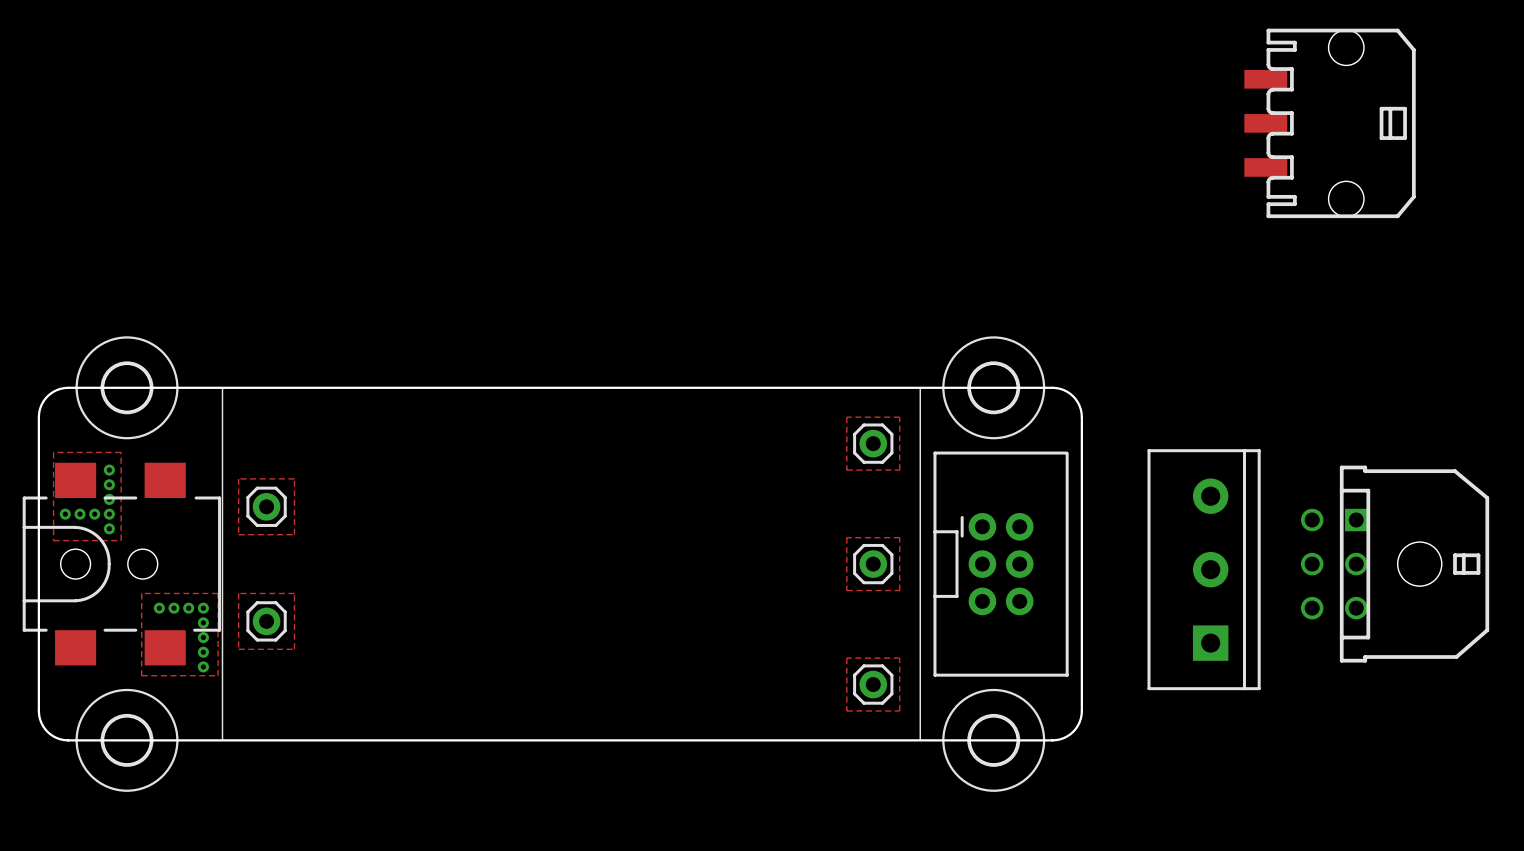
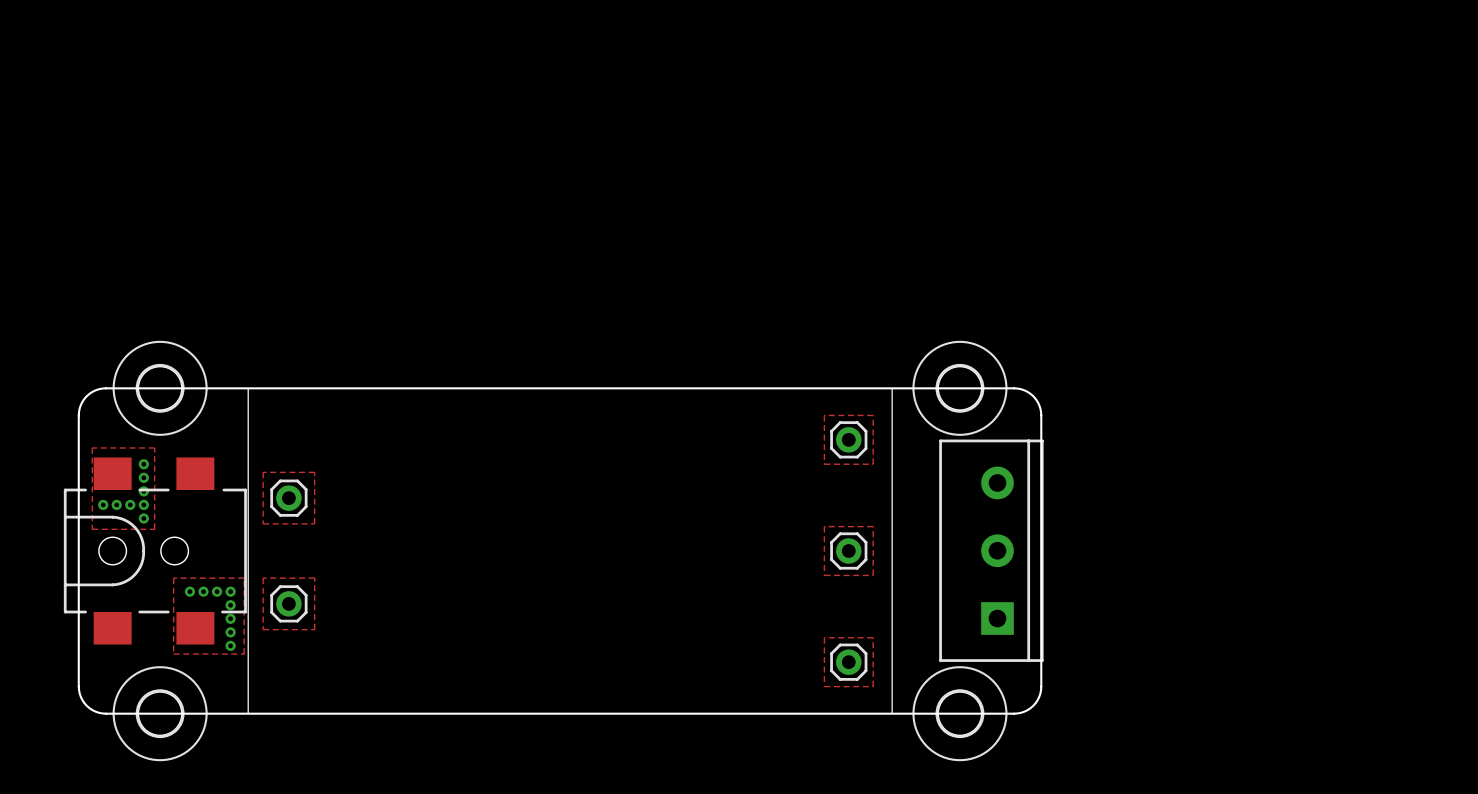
part: (1330, 123) -> none
part: (1001, 564) -> none
part: (1395, 564) -> none
part position: (1204, 569) -> (991, 550)

